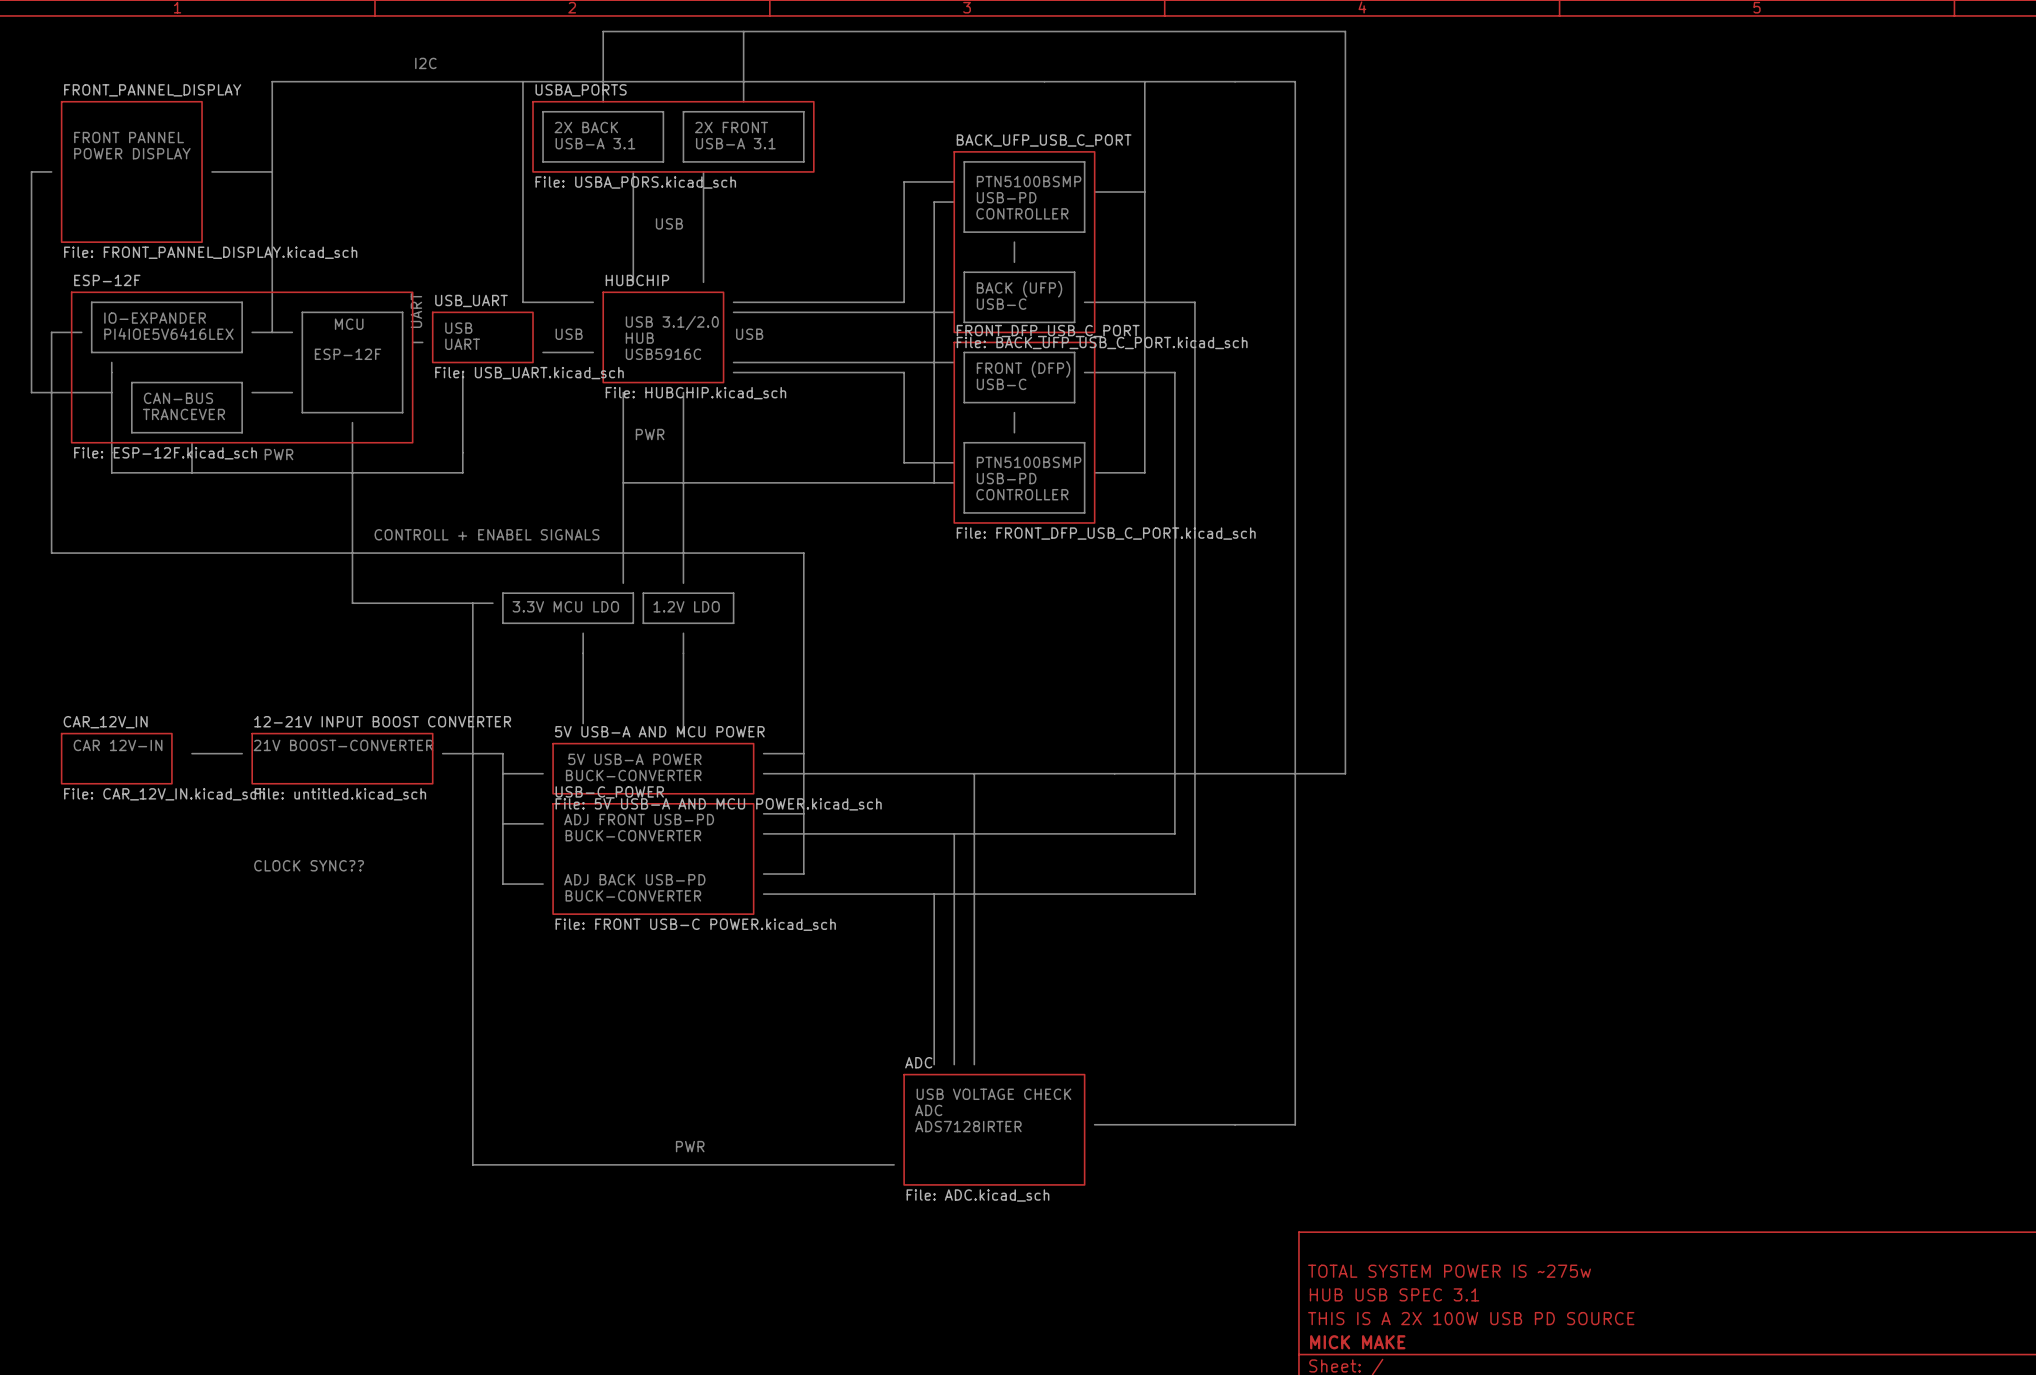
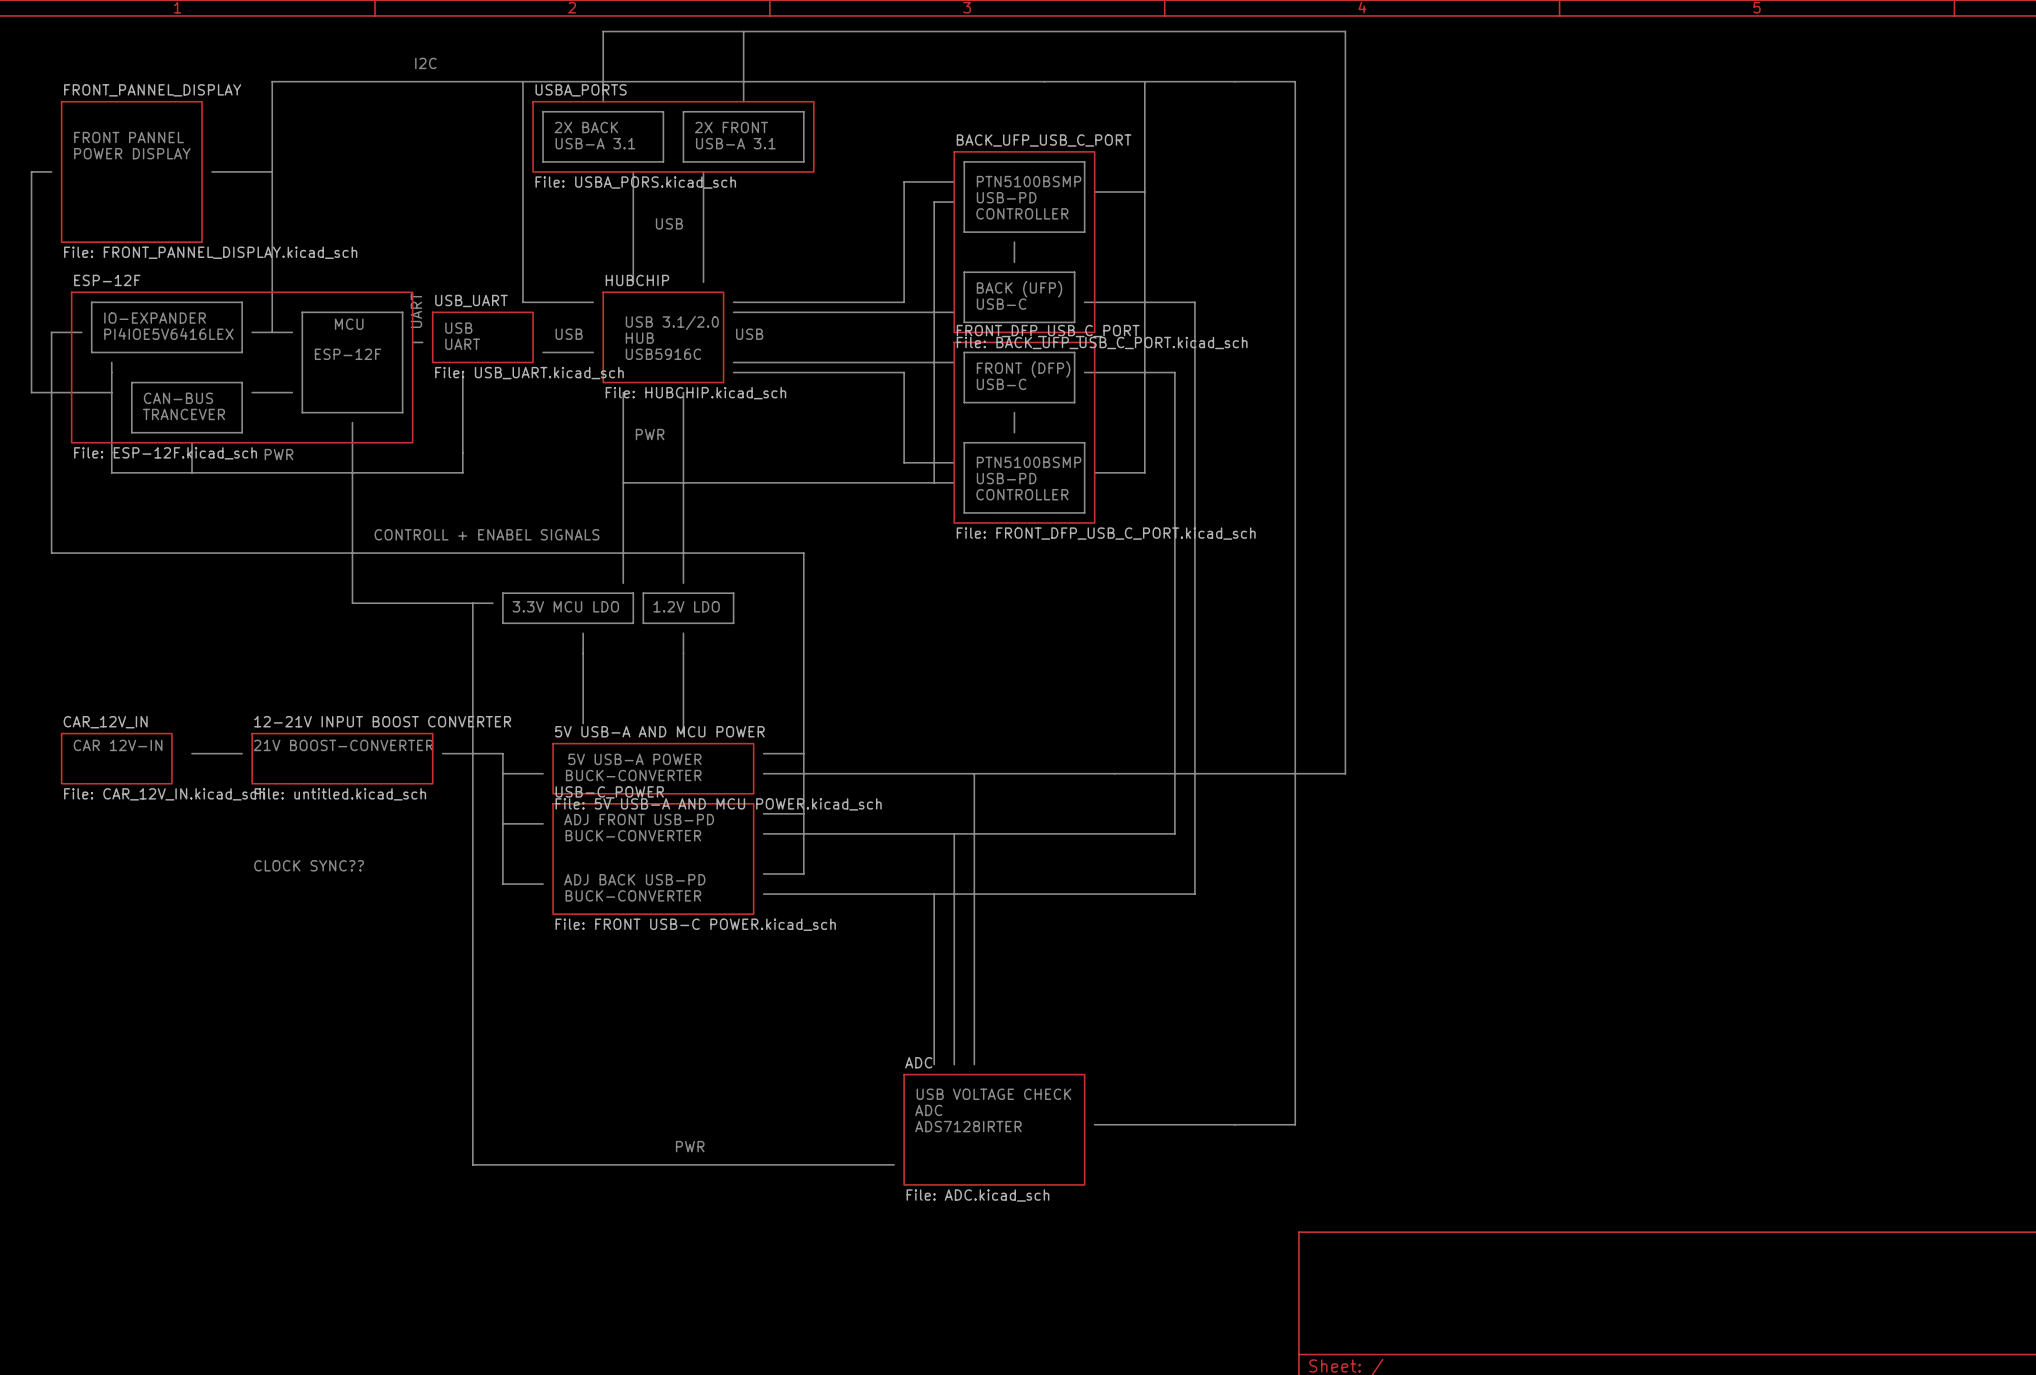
title block: TOTAL SYSTEM POWER IS ~275w (1449, 1271) -> none
title block: HUB USB SPEC 3.1 (1394, 1294) -> none
title block: THIS IS A 2X 100W USB PD SOURCE (1471, 1318) -> none
title block: MICK MAKE (1357, 1342) -> none

